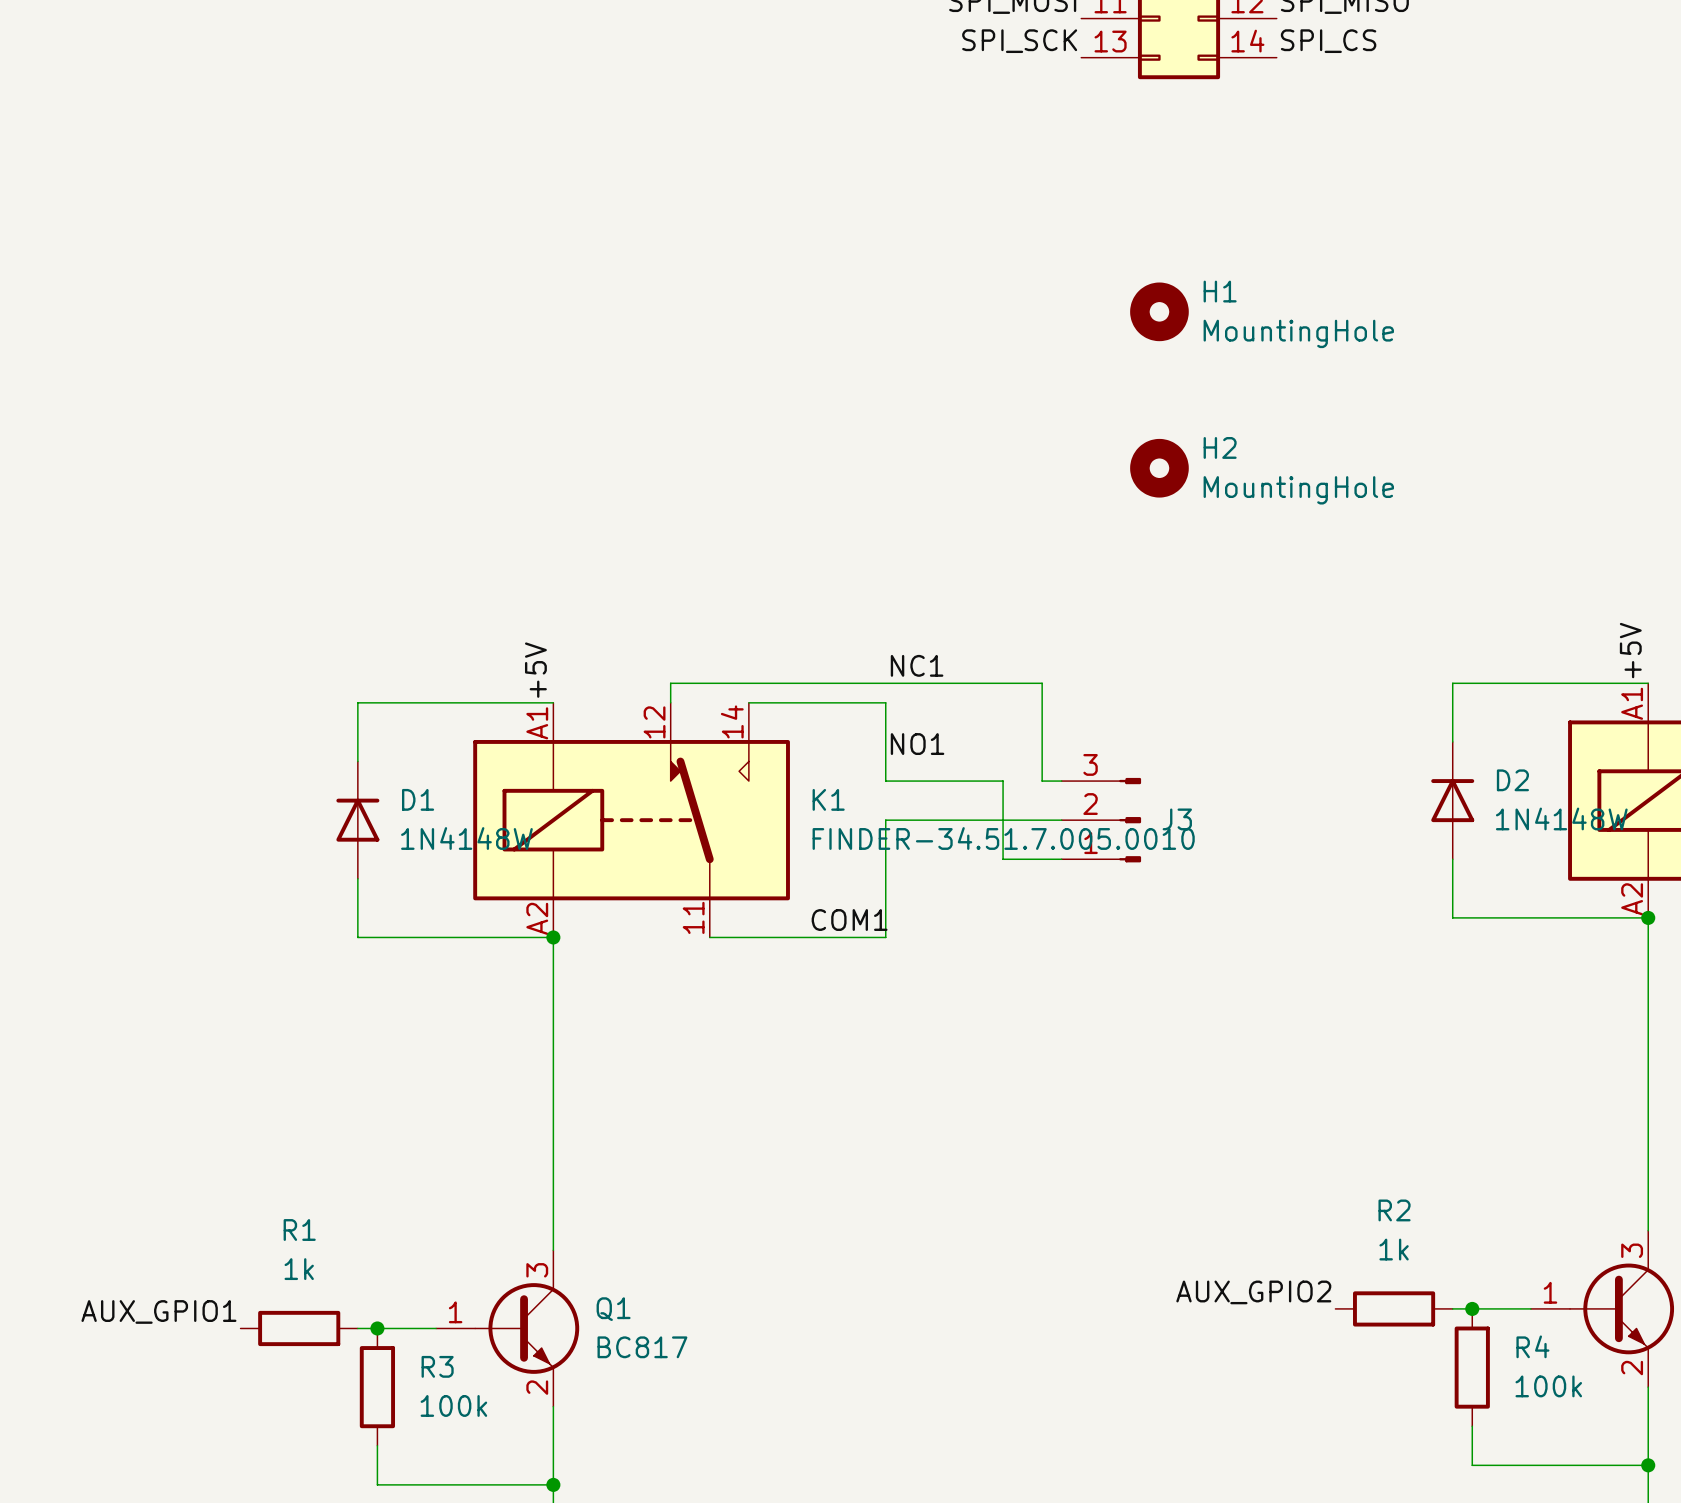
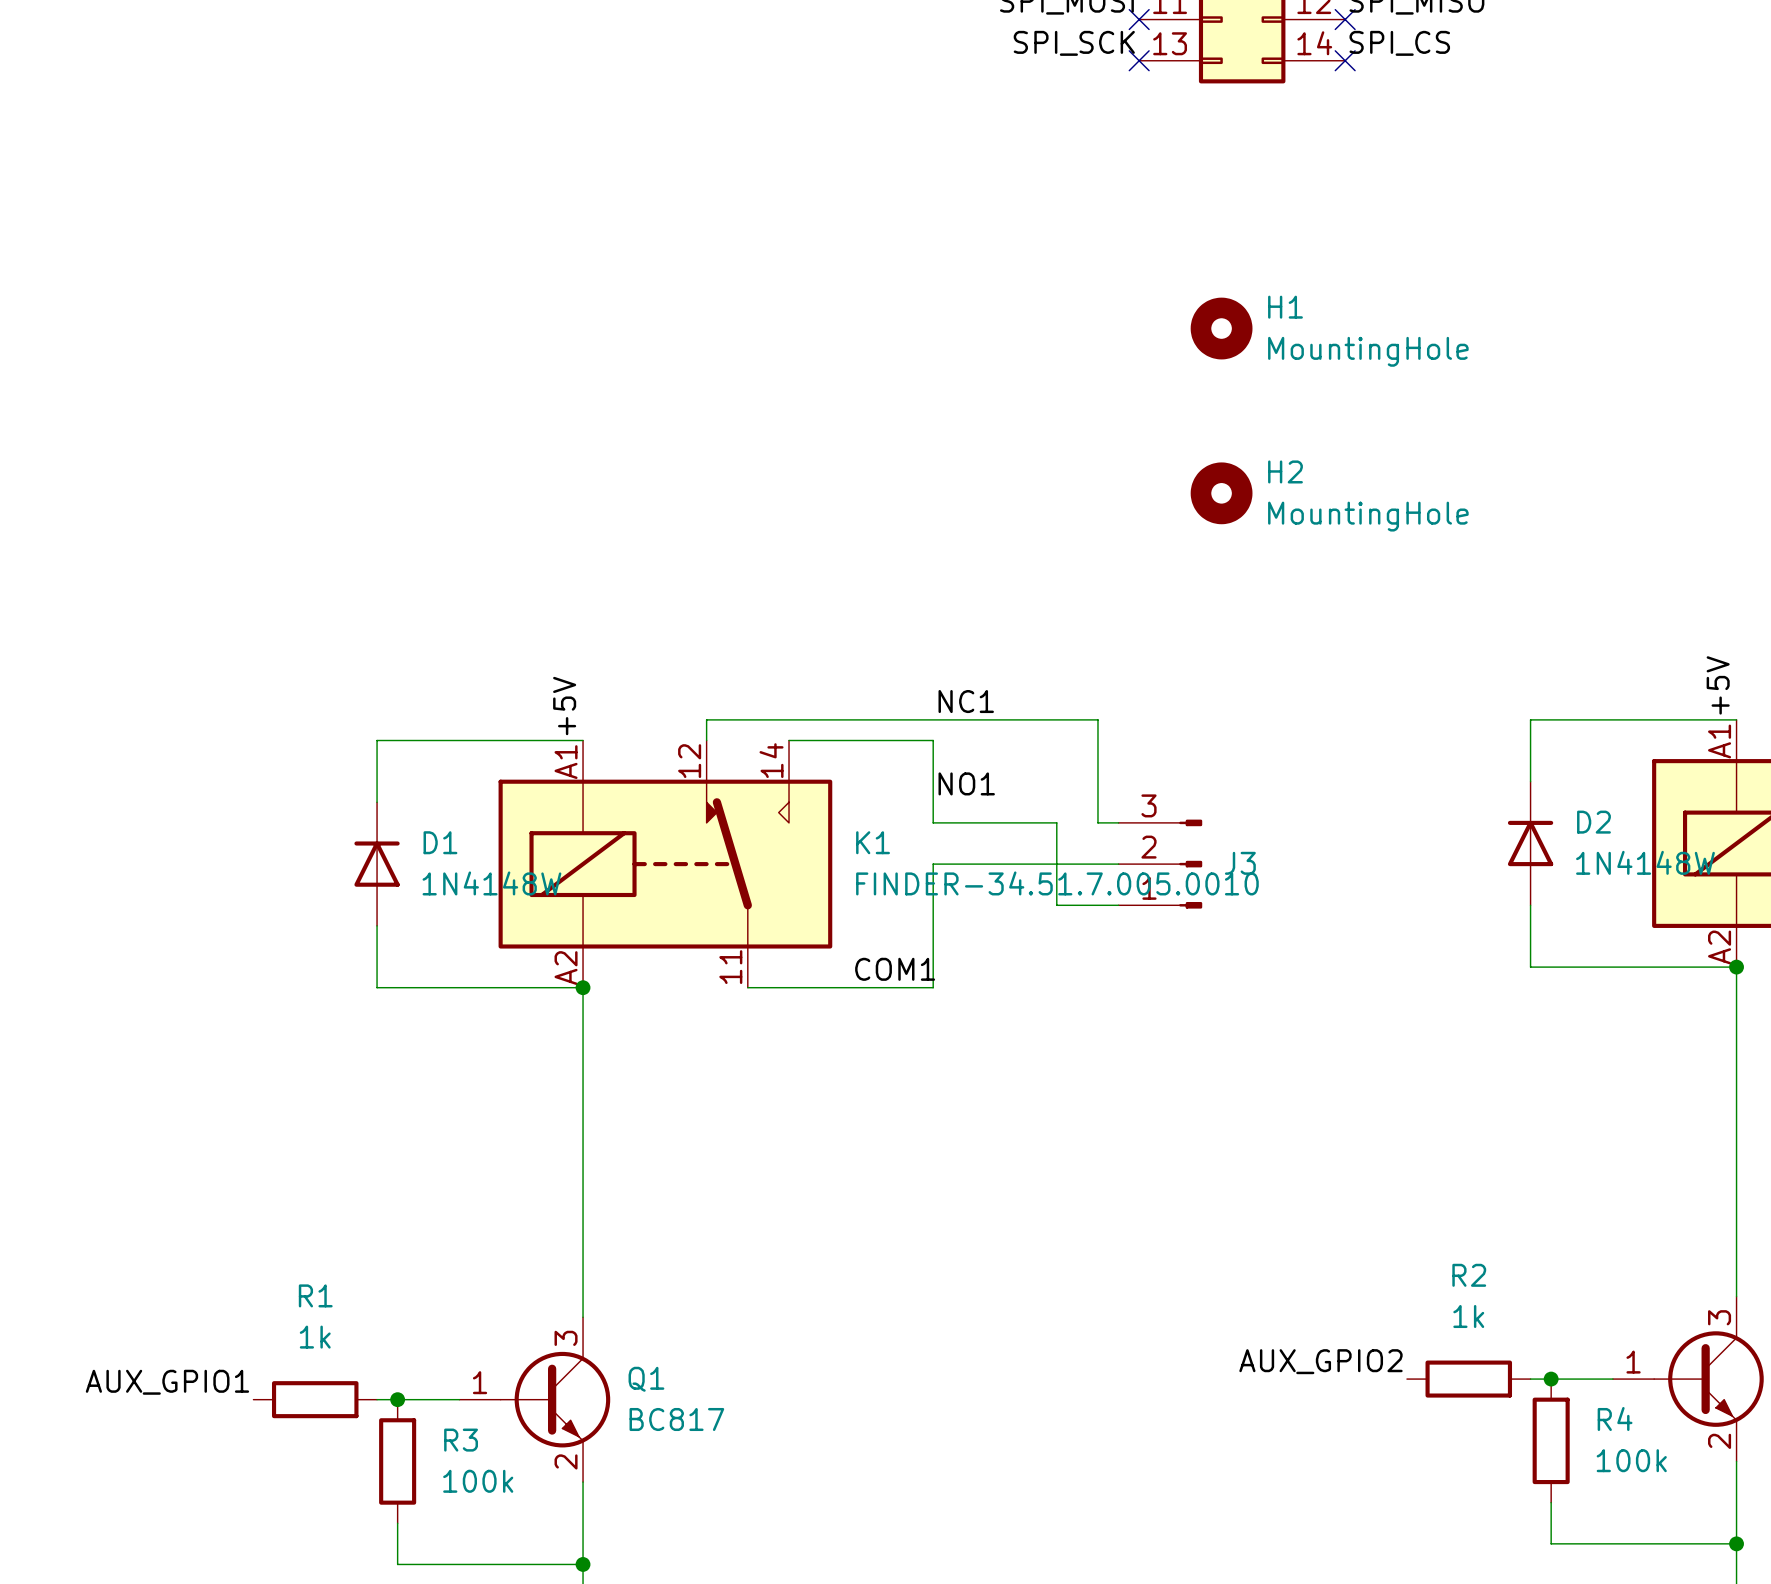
no-connect mark: none -> (1139, 19)
no-connect mark: none -> (1345, 19)
no-connect mark: none -> (1139, 60)
no-connect mark: none -> (1345, 60)

